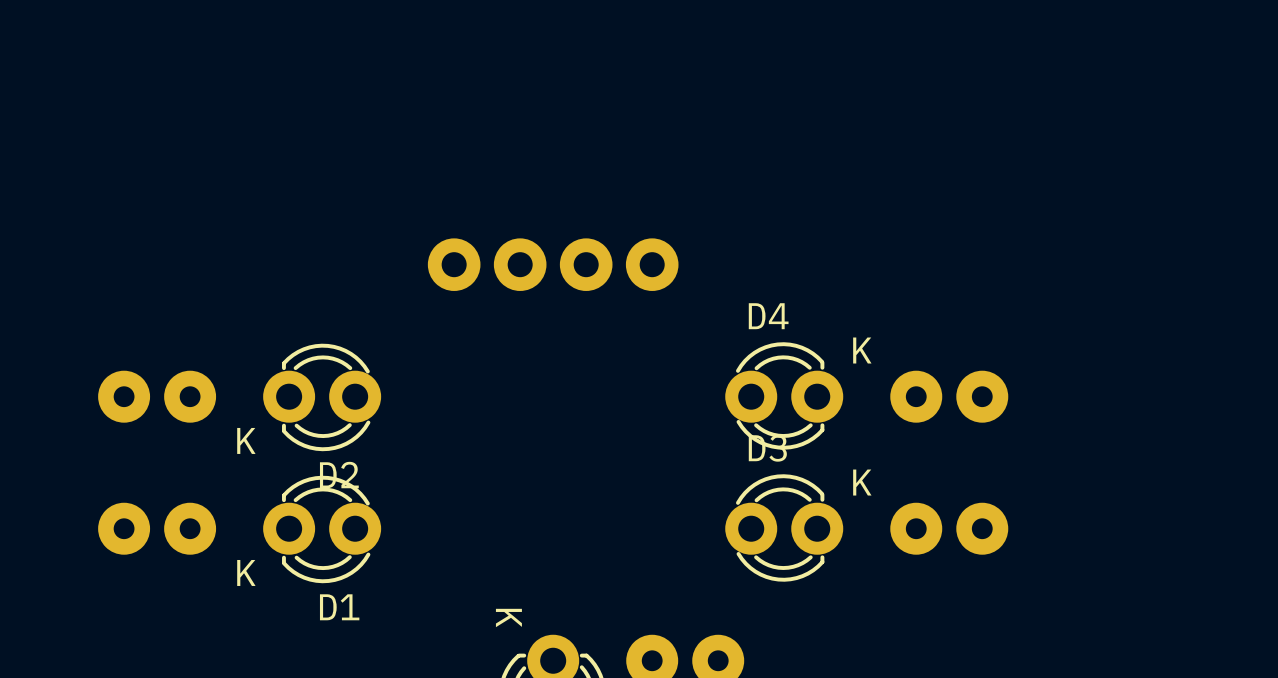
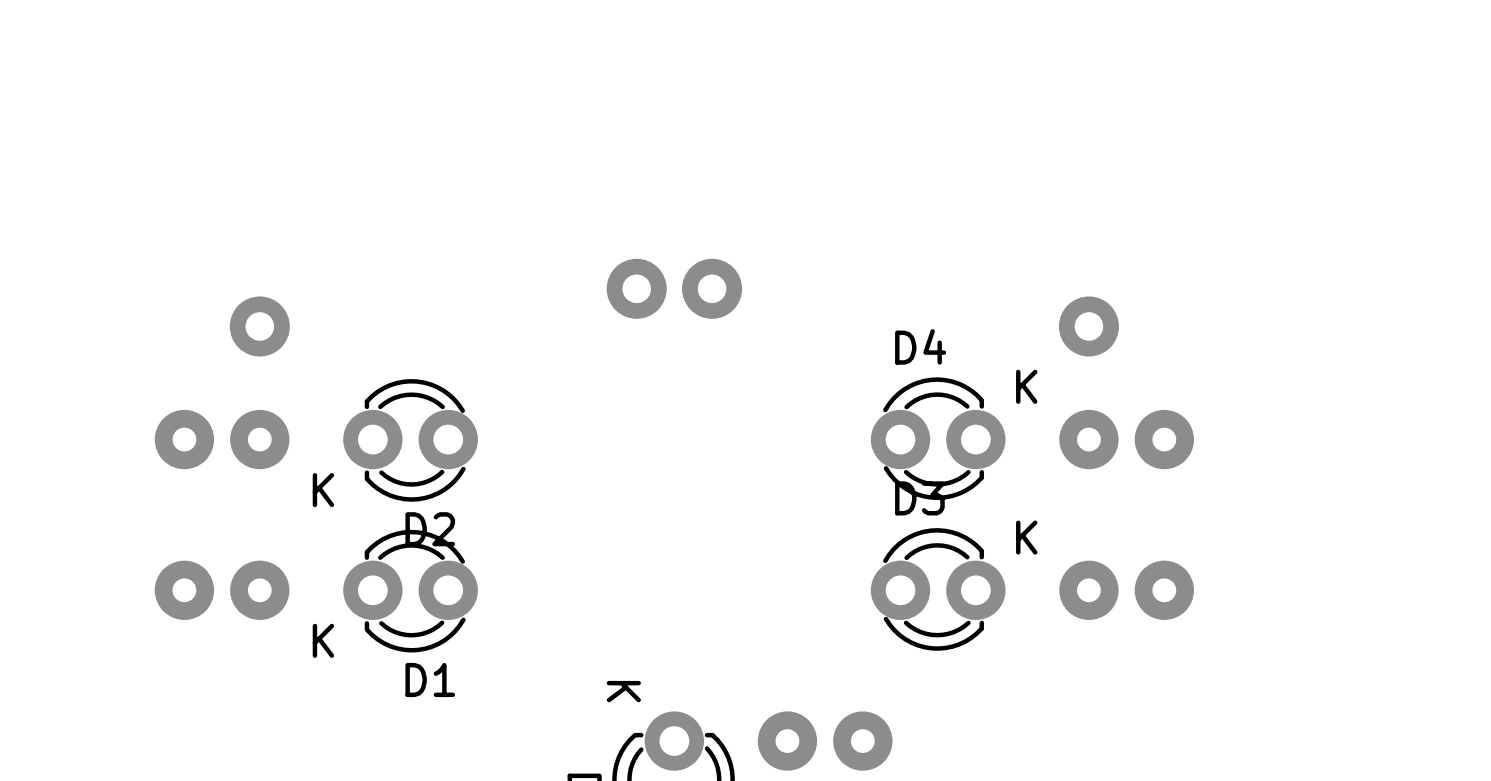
part: (454, 264) -> none
part: (652, 264) -> none
part: none -> (259, 326)
part: none -> (1088, 326)

